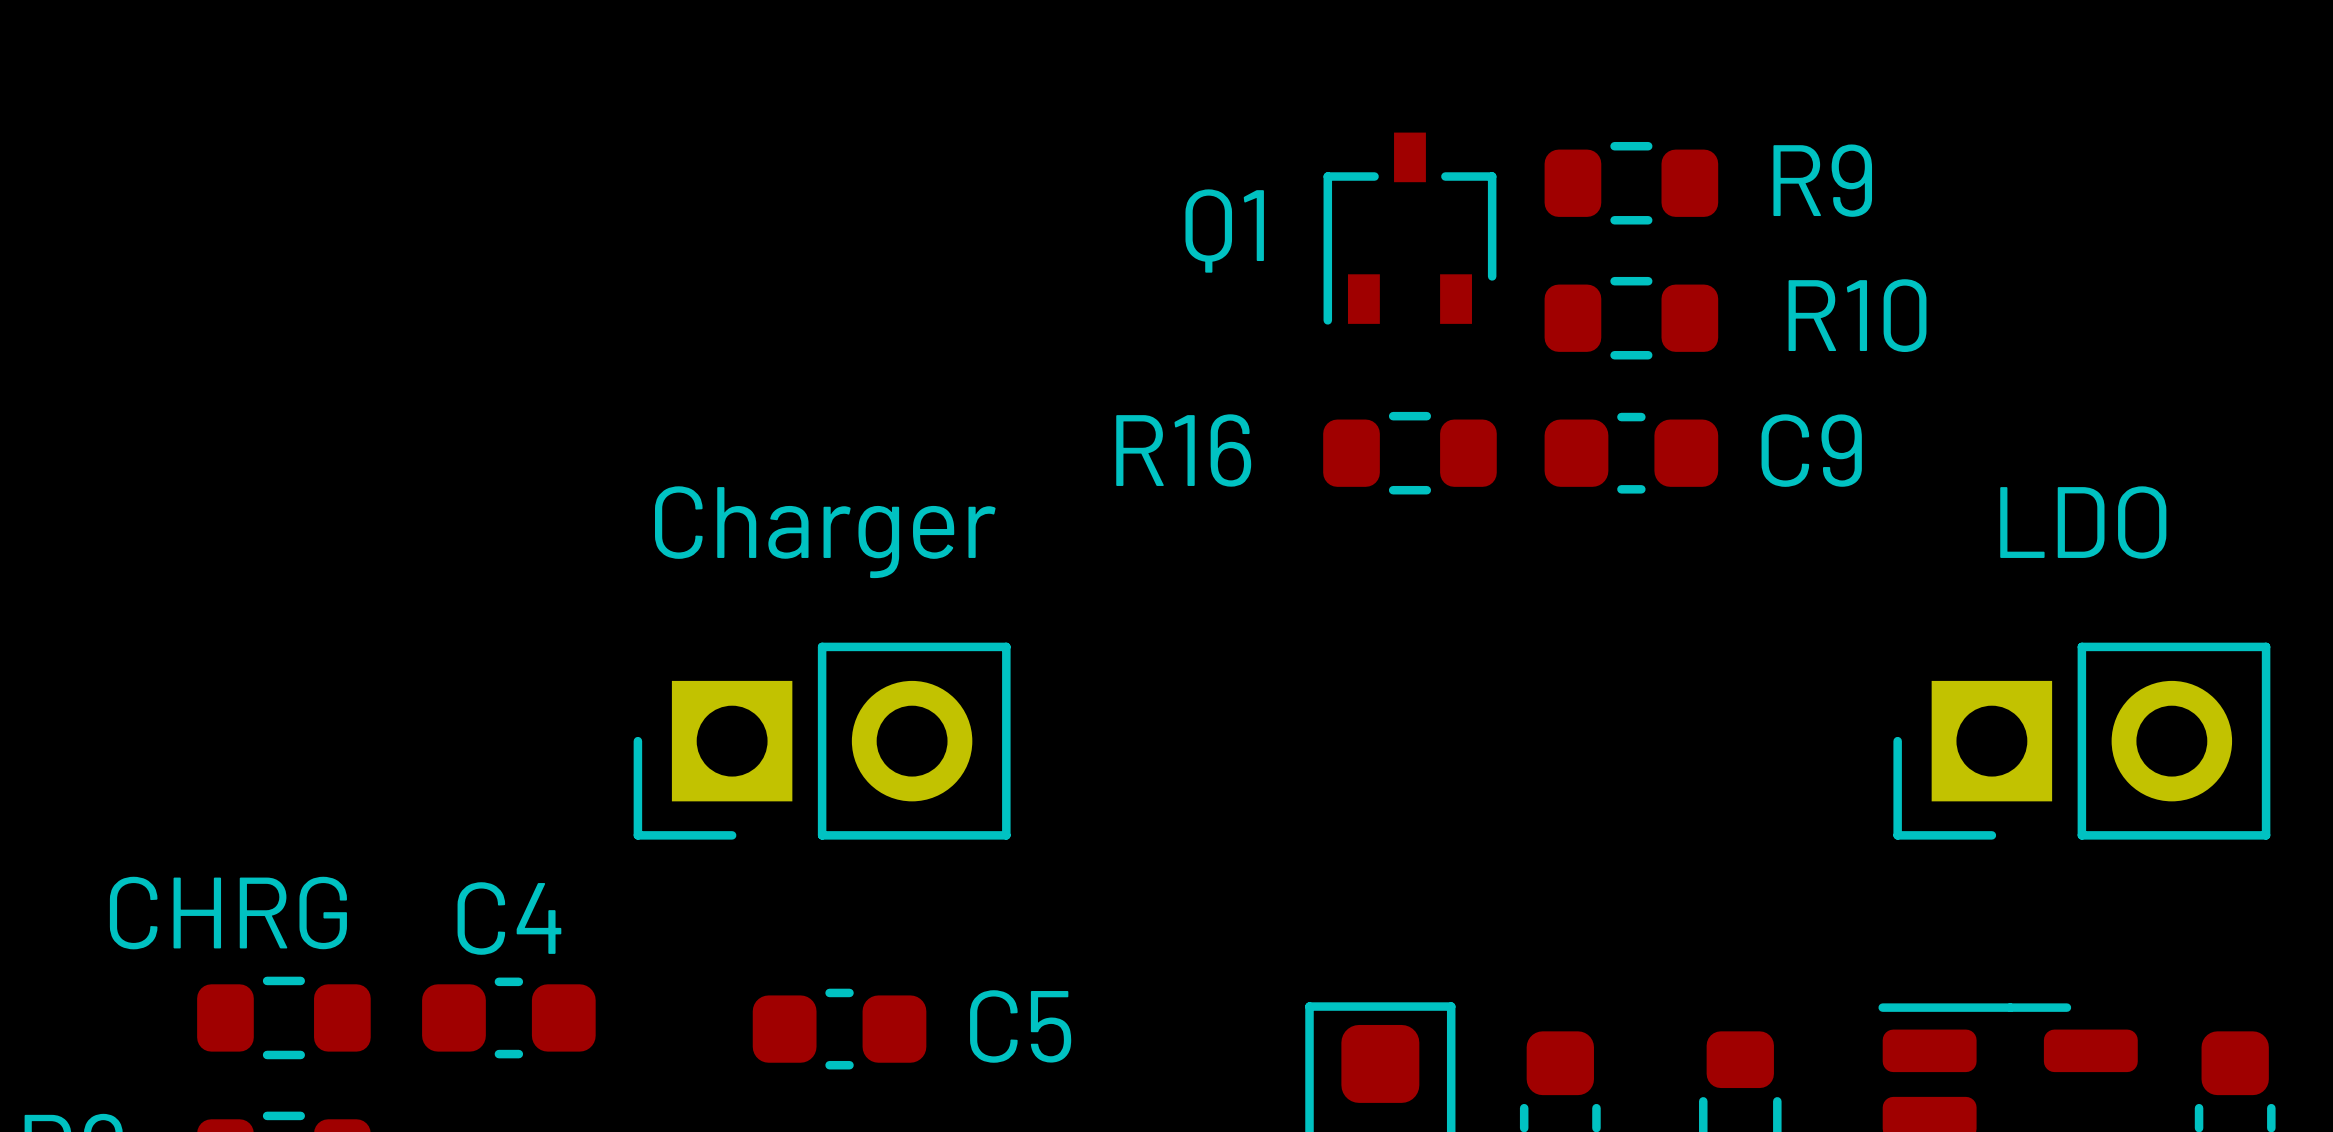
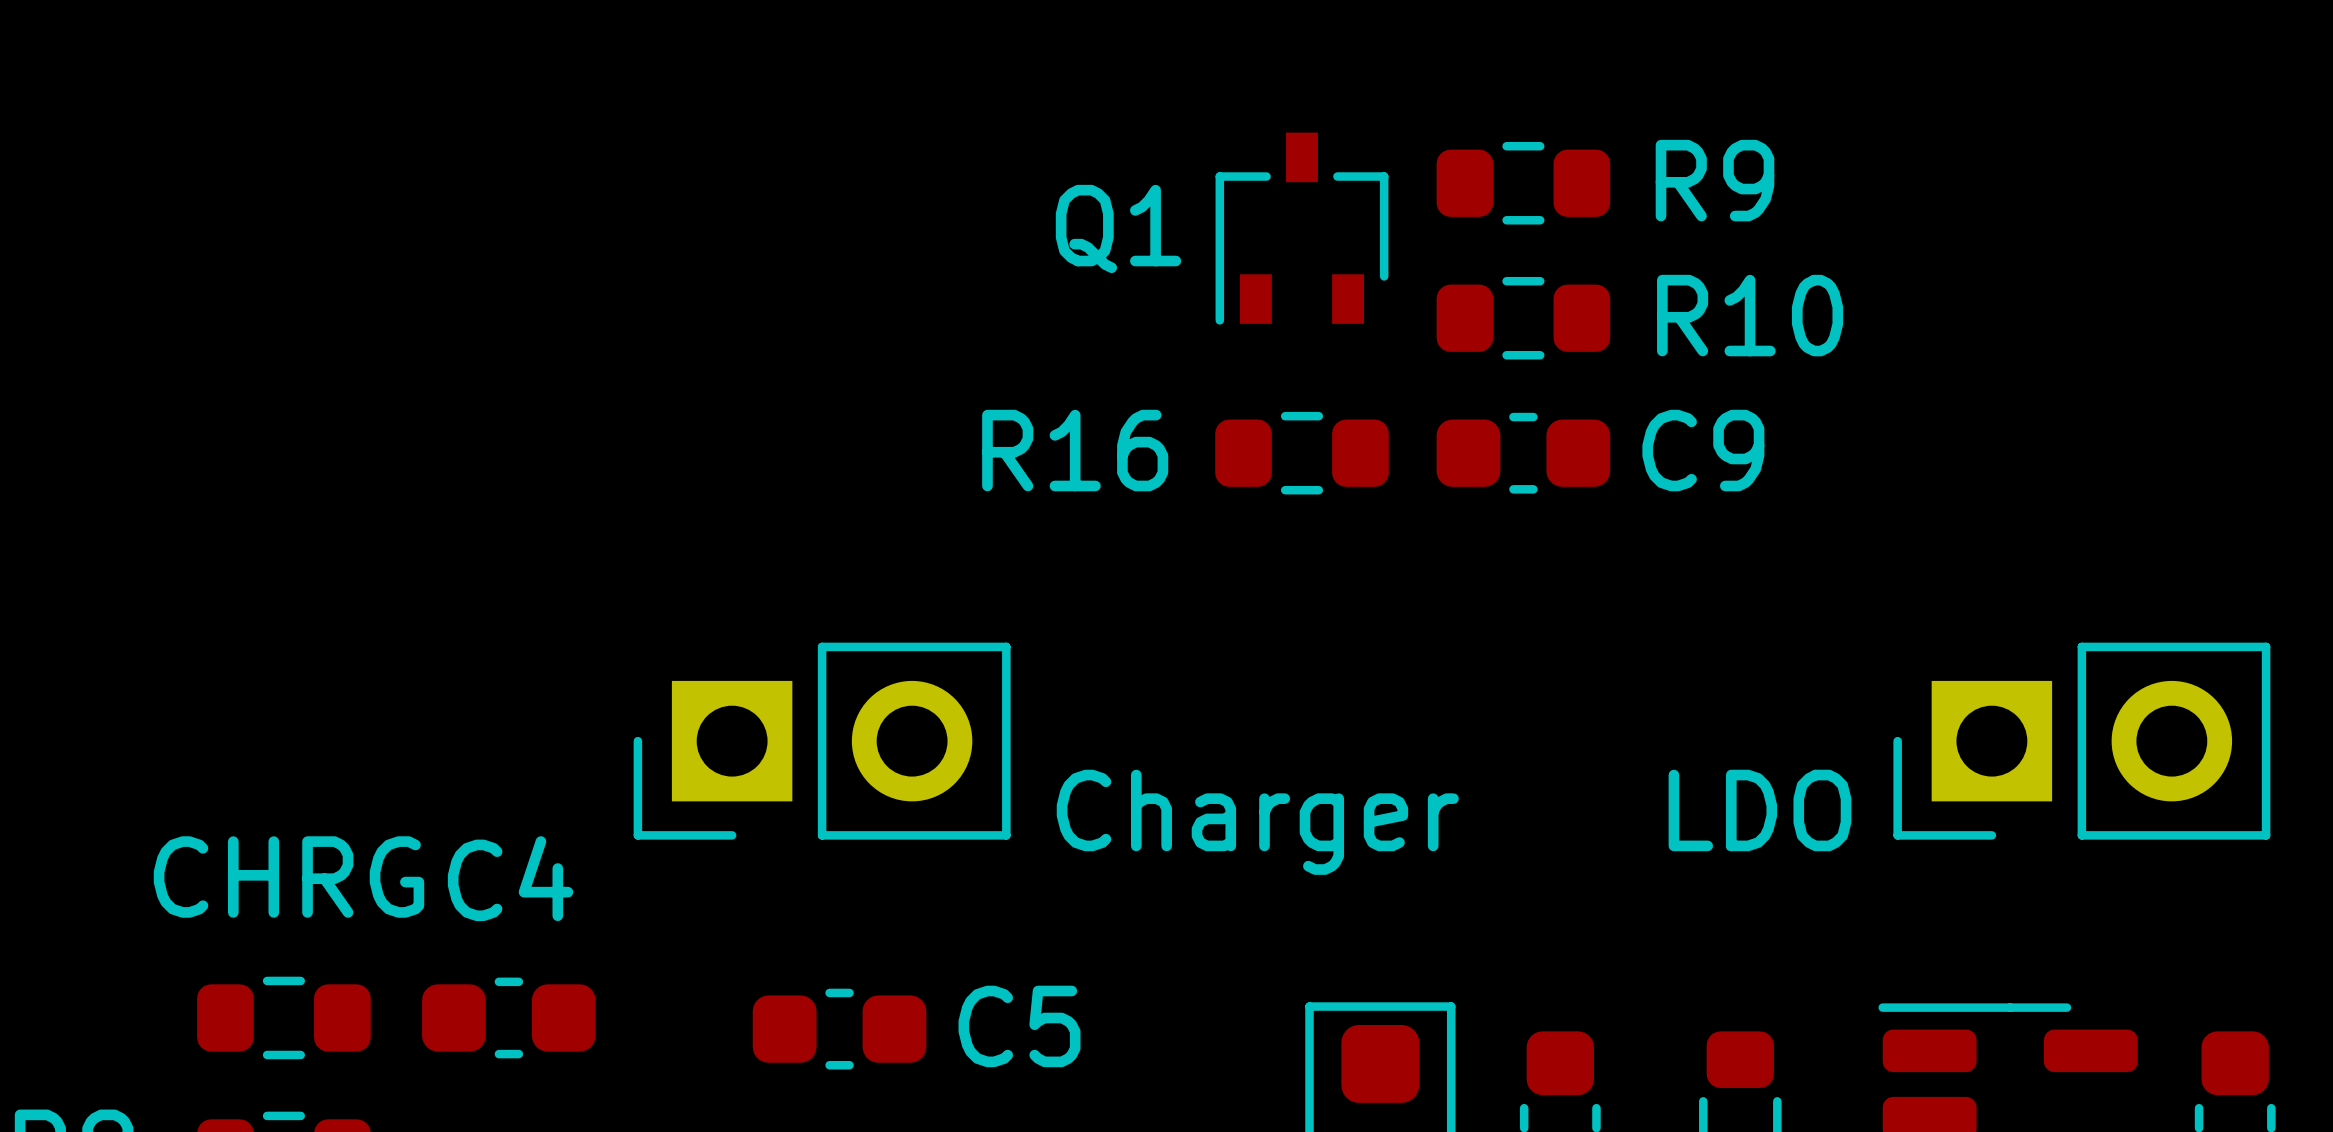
R9 position: (1631, 183) -> (1523, 183)
Q1 position: (1409, 228) -> (1302, 228)
R10 position: (1631, 318) -> (1523, 318)
R16 position: (1409, 453) -> (1302, 453)
C9 position: (1631, 453) -> (1523, 453)
part text position: LDO (2083, 522) -> LDO (1759, 810)
part text position: Charger (825, 532) -> Charger (1257, 822)
text position: CHRG (228, 913) -> CHRG (288, 877)
C4 name position: C4 (509, 918) -> C4 (510, 878)

